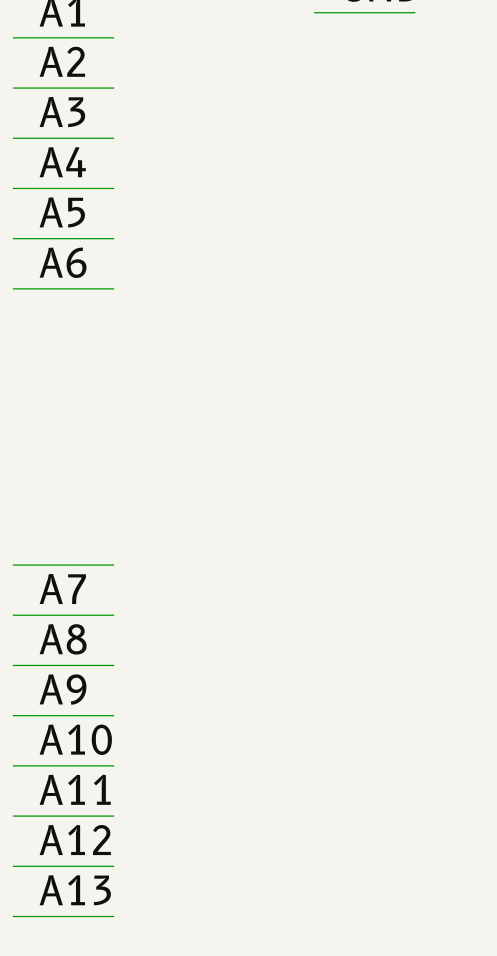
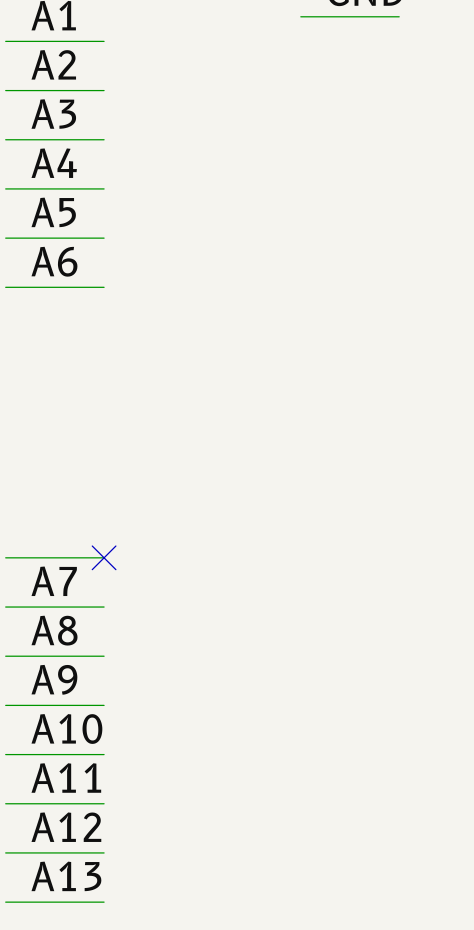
no-connect mark: none -> (104, 557)

